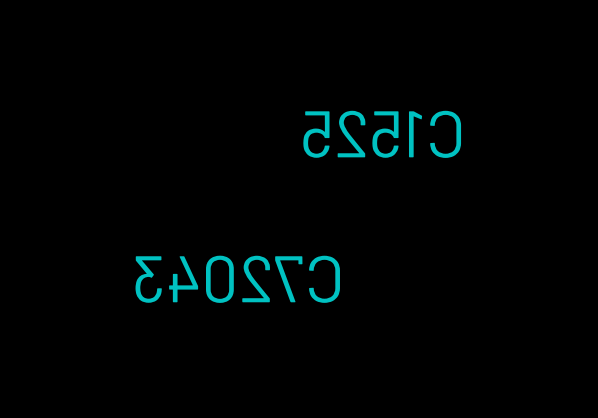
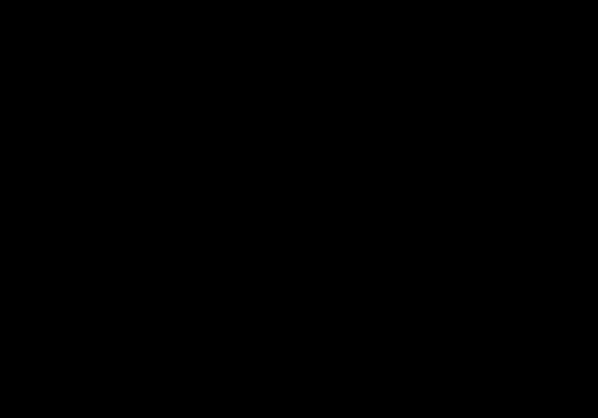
drawing: [303, 110, 462, 158] -> none
drawing: [135, 255, 340, 303] -> none

